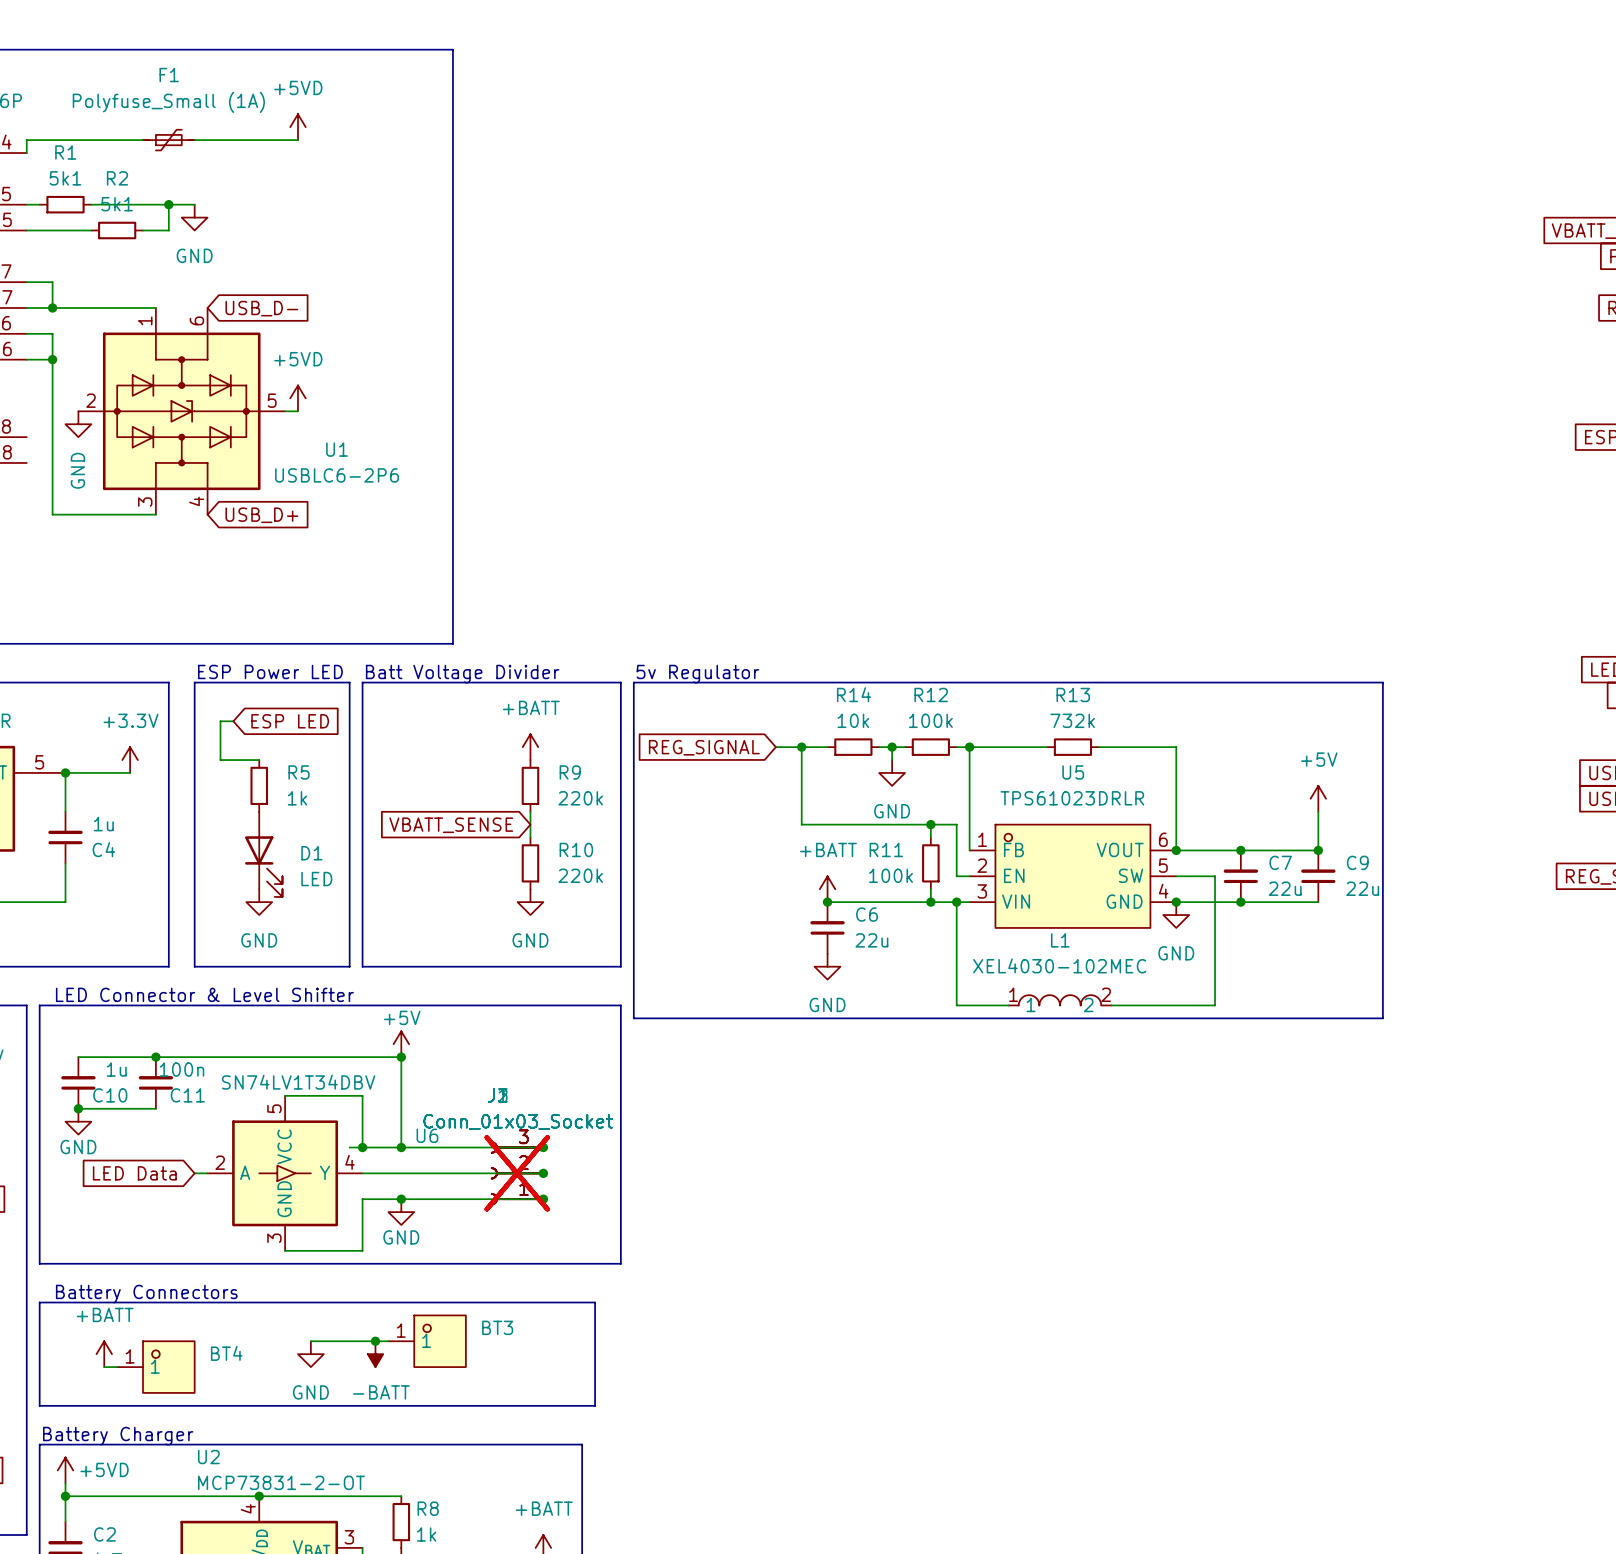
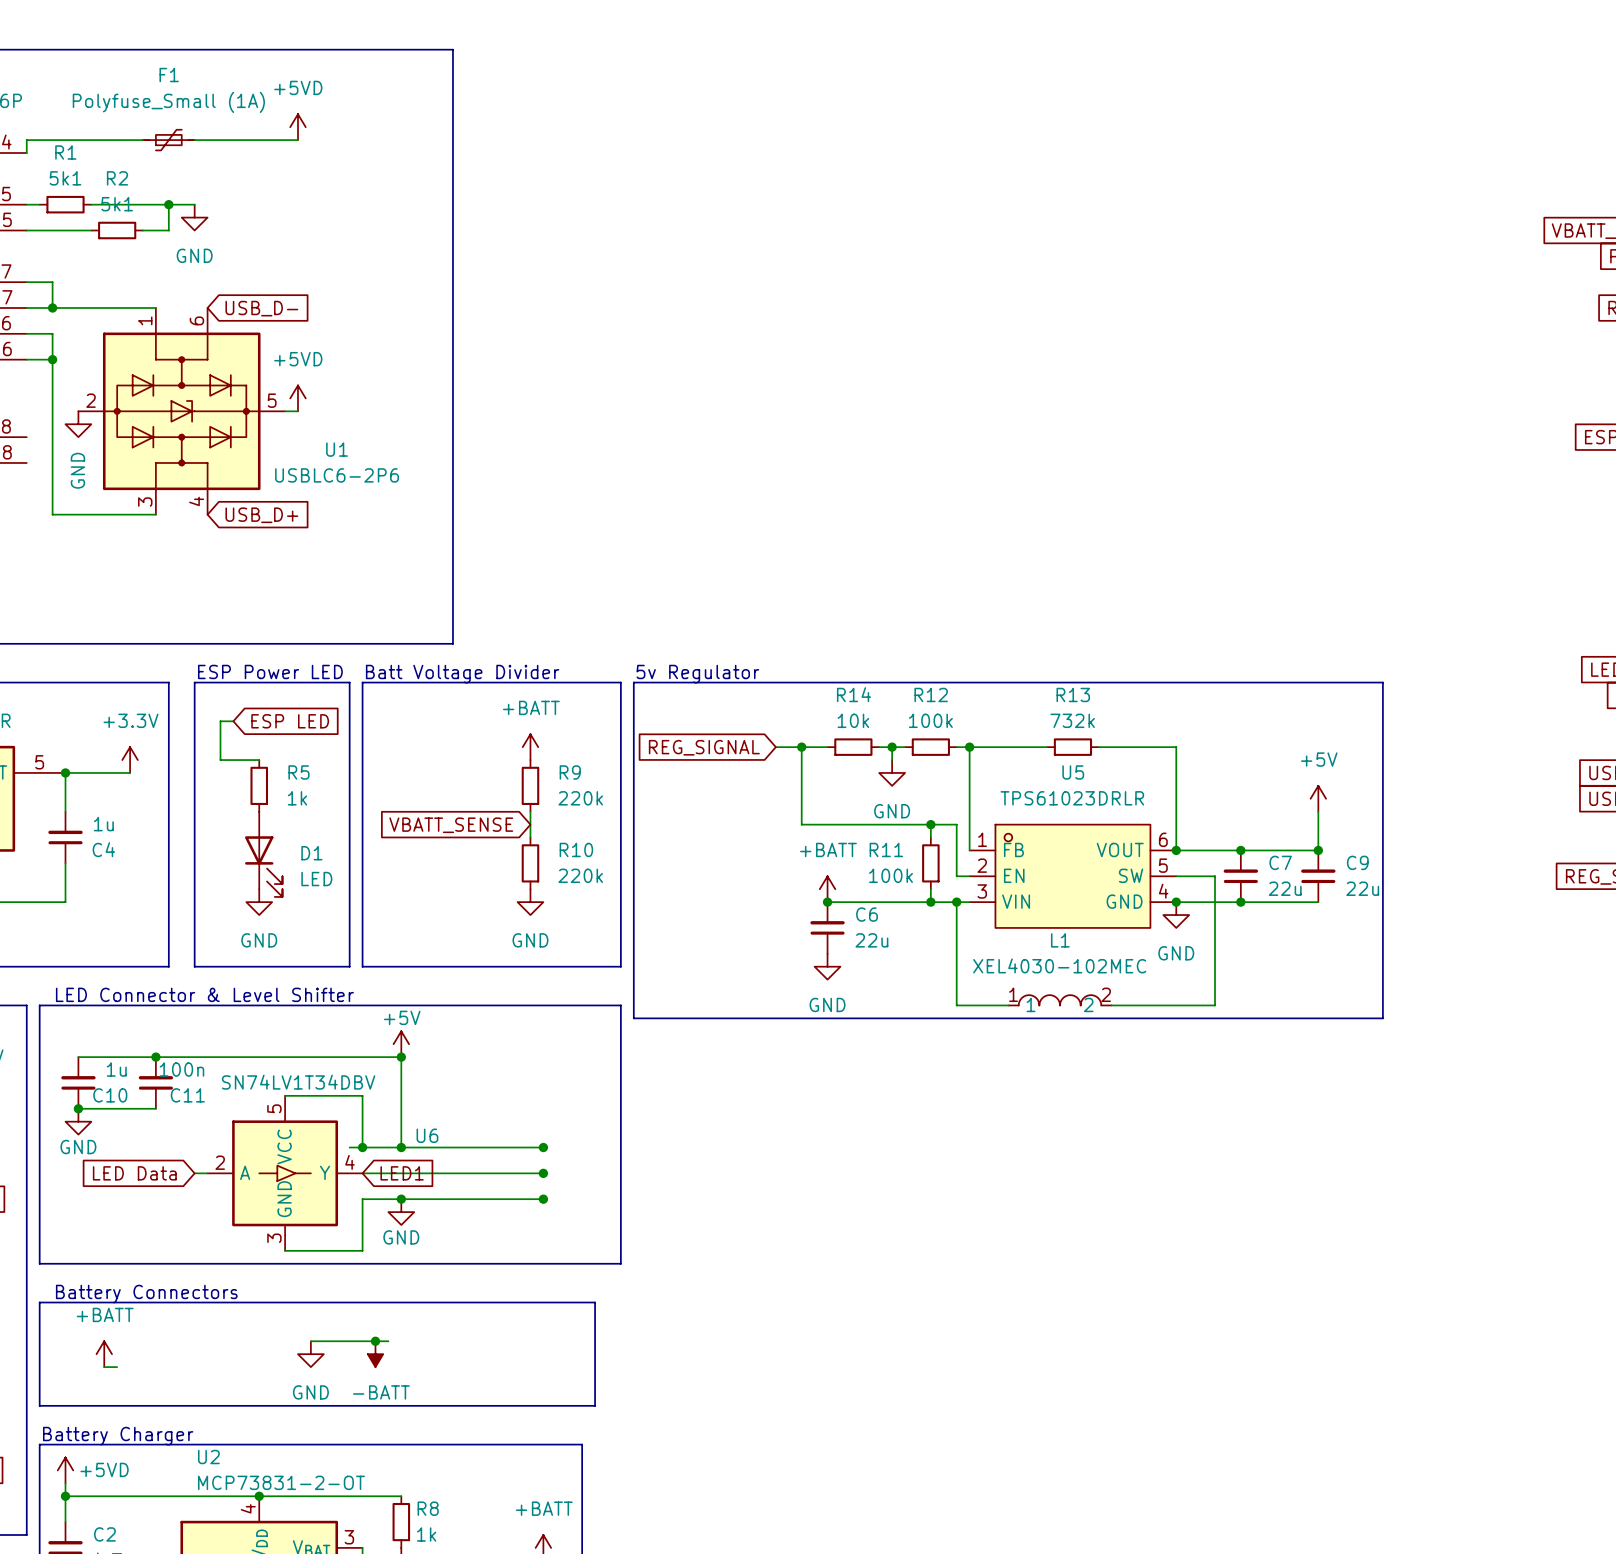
global label: none -> LED1 (402, 1173)
part: Conn_01x03_Socket (517, 1173) -> none
part: Conn_01x03_Socket (517, 1173) -> none
part: Conn_01x03_Socket (517, 1173) -> none
BT3: (427, 1341) -> none
BT4: (155, 1367) -> none

